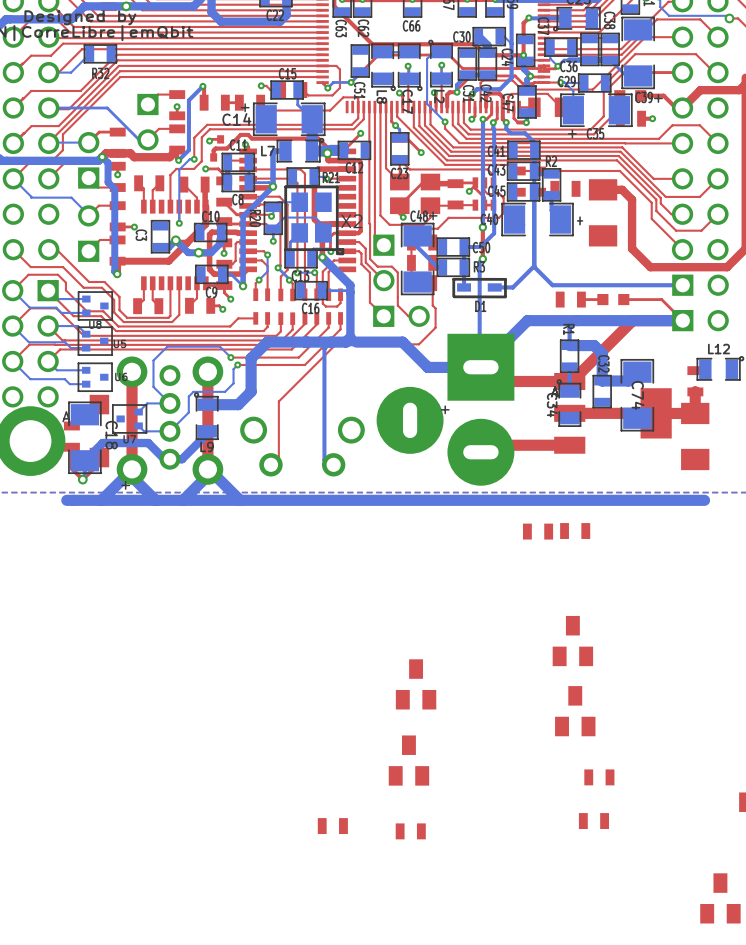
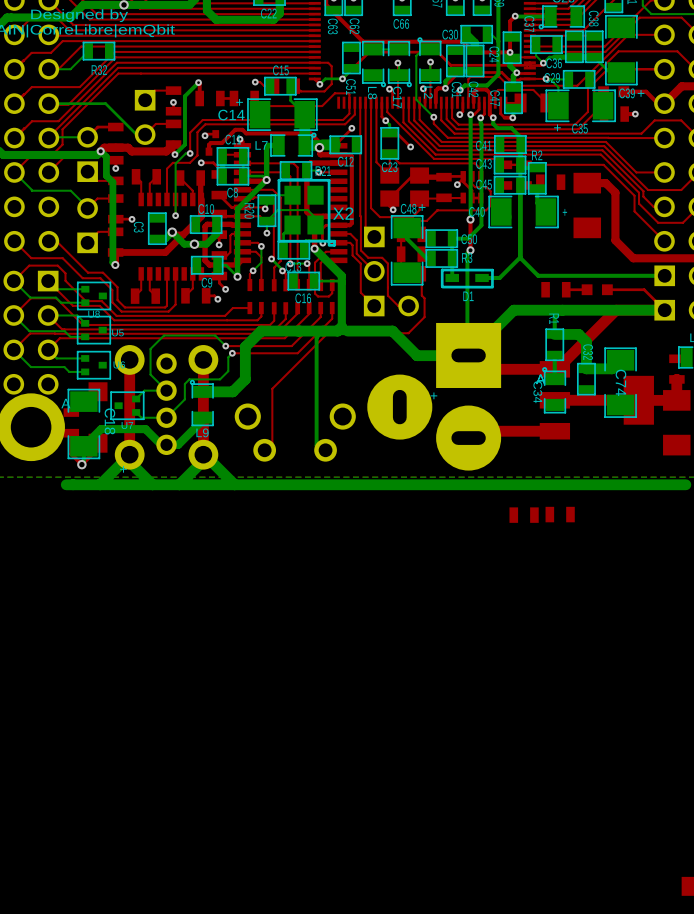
part: (572, 641) -> none
part: (416, 684) -> none
part: (575, 711) -> none
part: (408, 760) -> none
part: (599, 777) -> none
part: (593, 821) -> none
part: (332, 826) -> none
part: (410, 831) -> none

